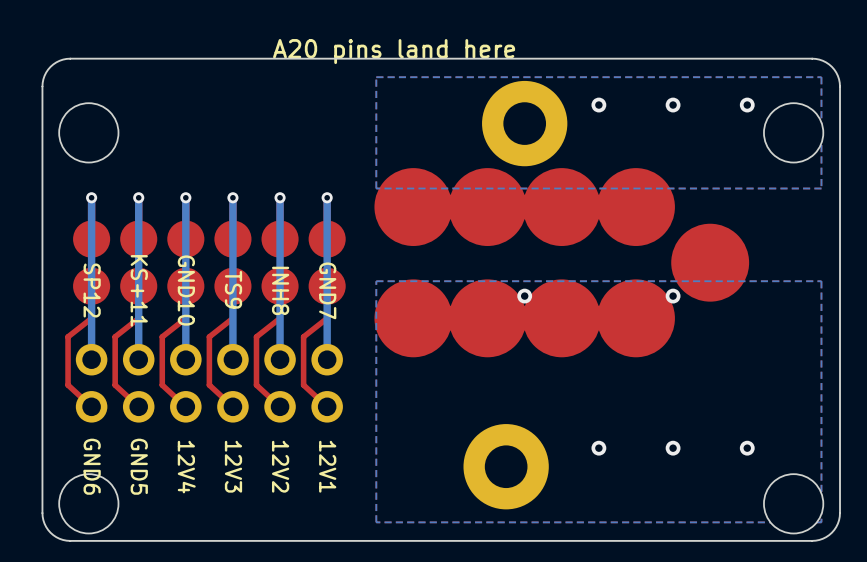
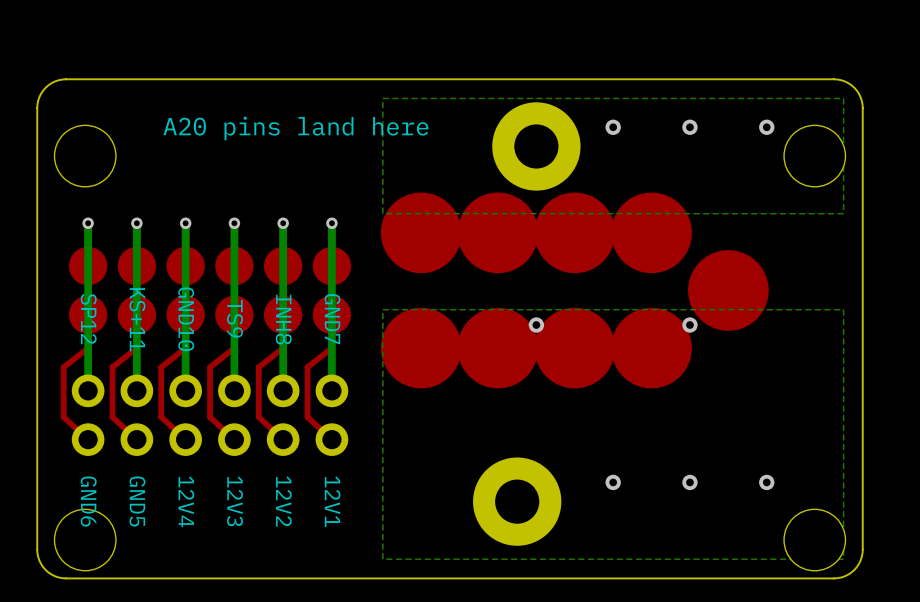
text position: A20 pins land here (394, 51) -> A20 pins land here (295, 128)

